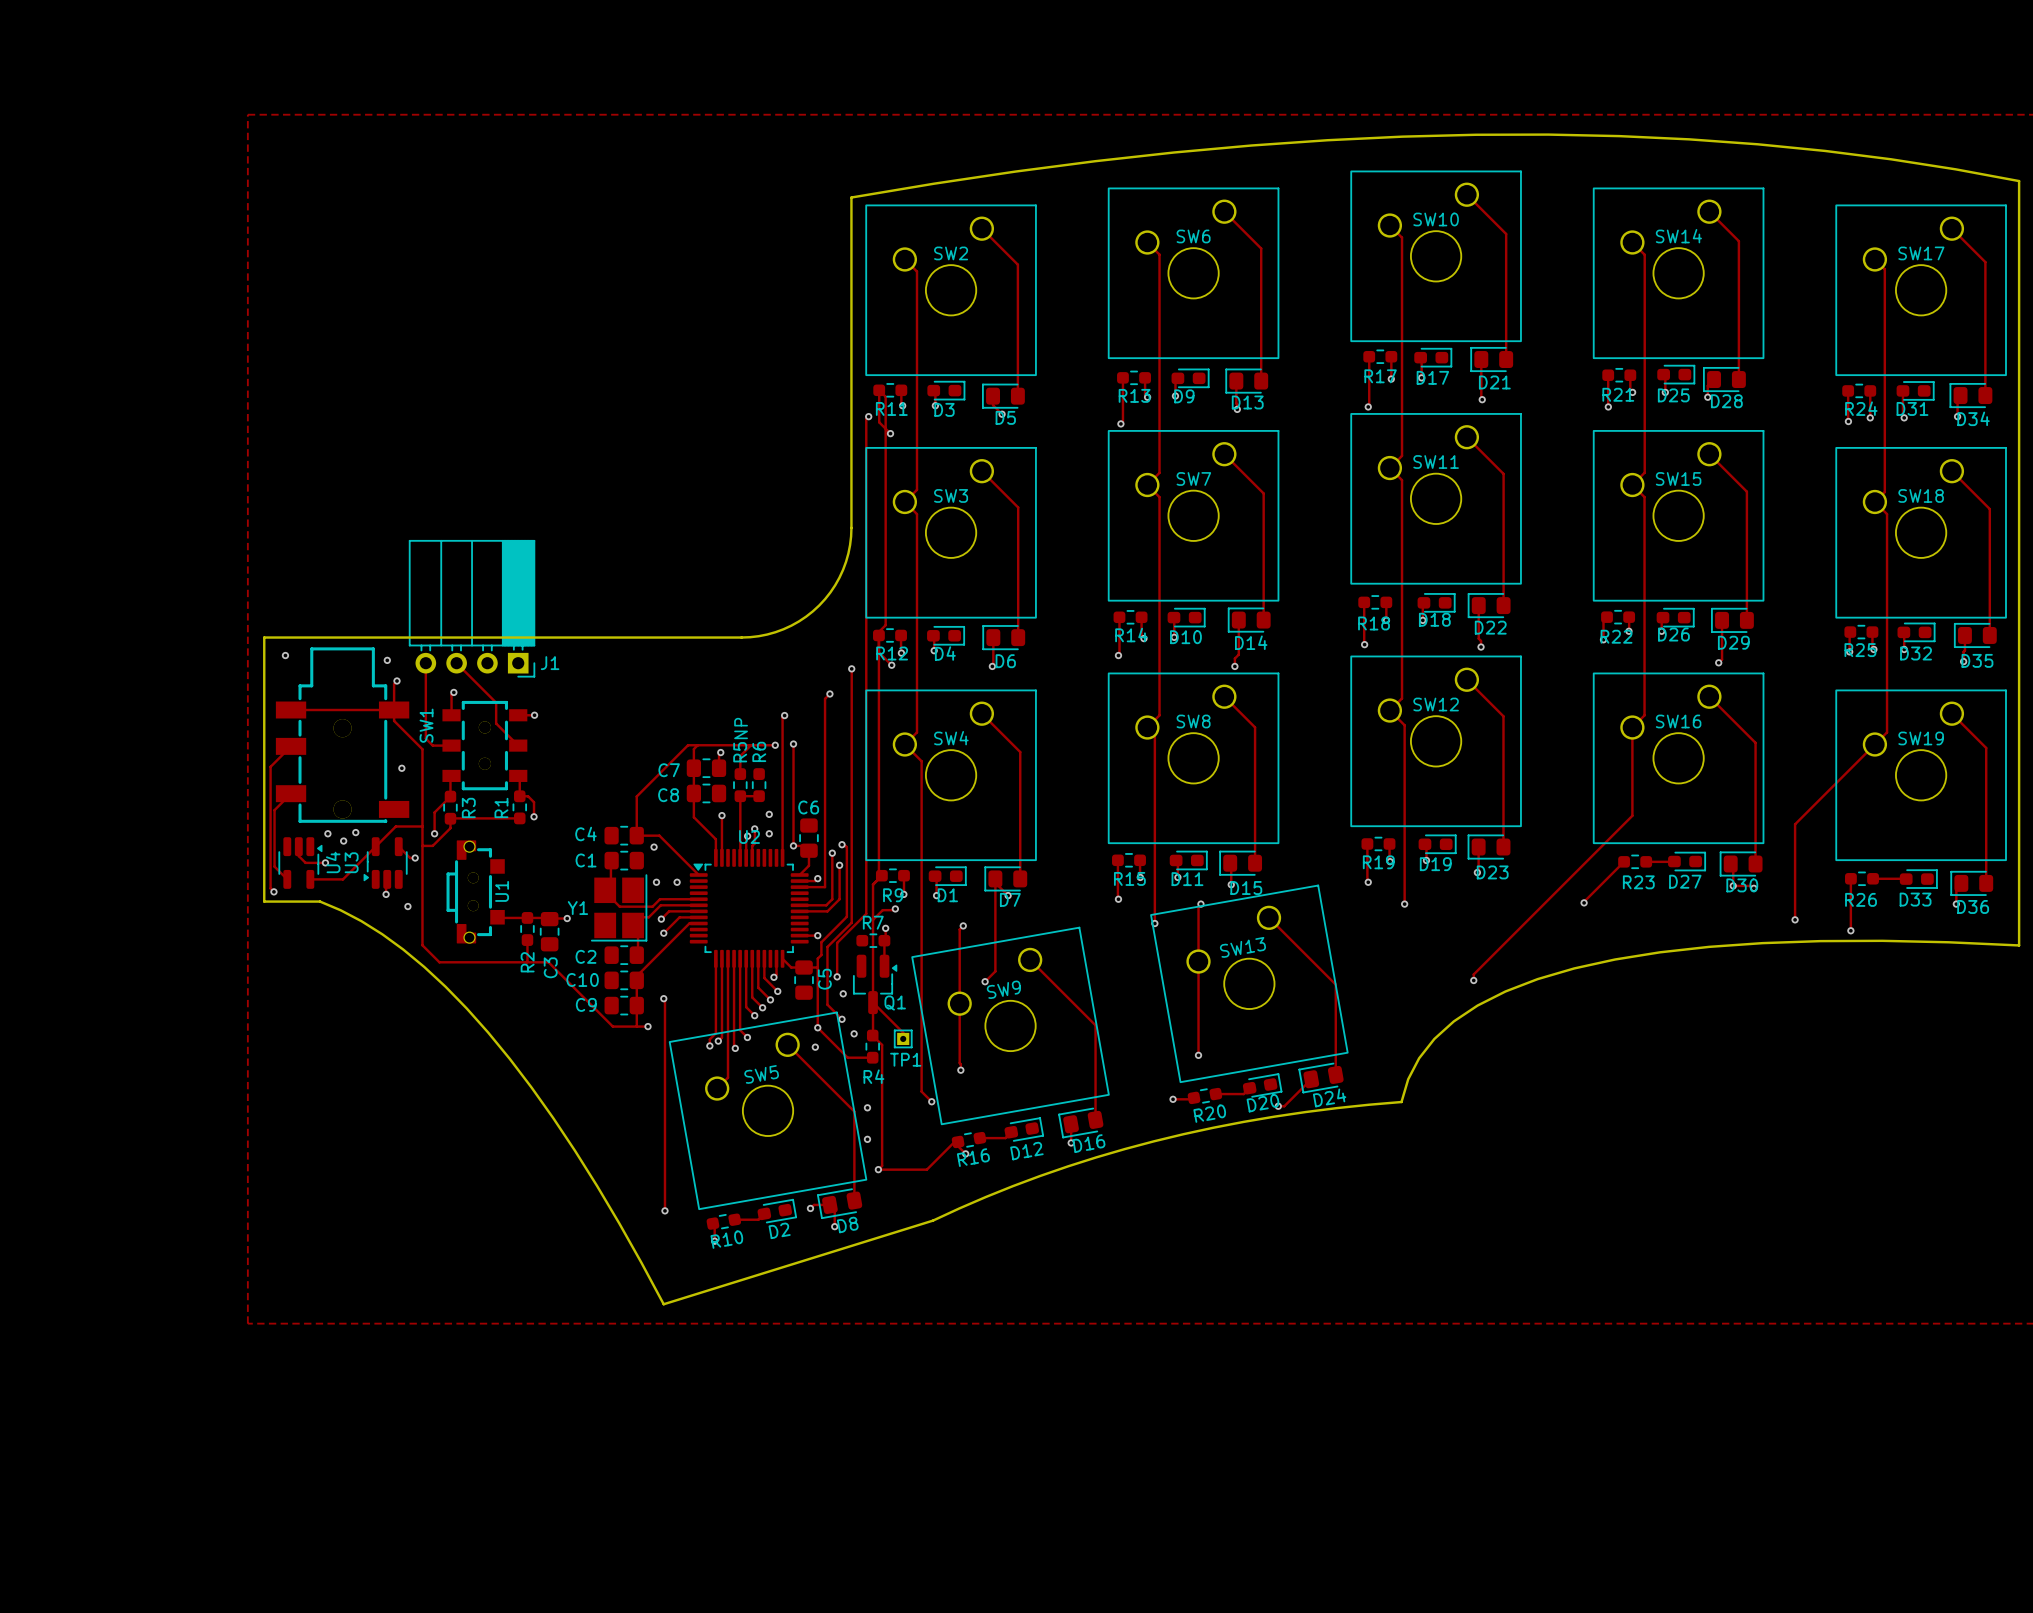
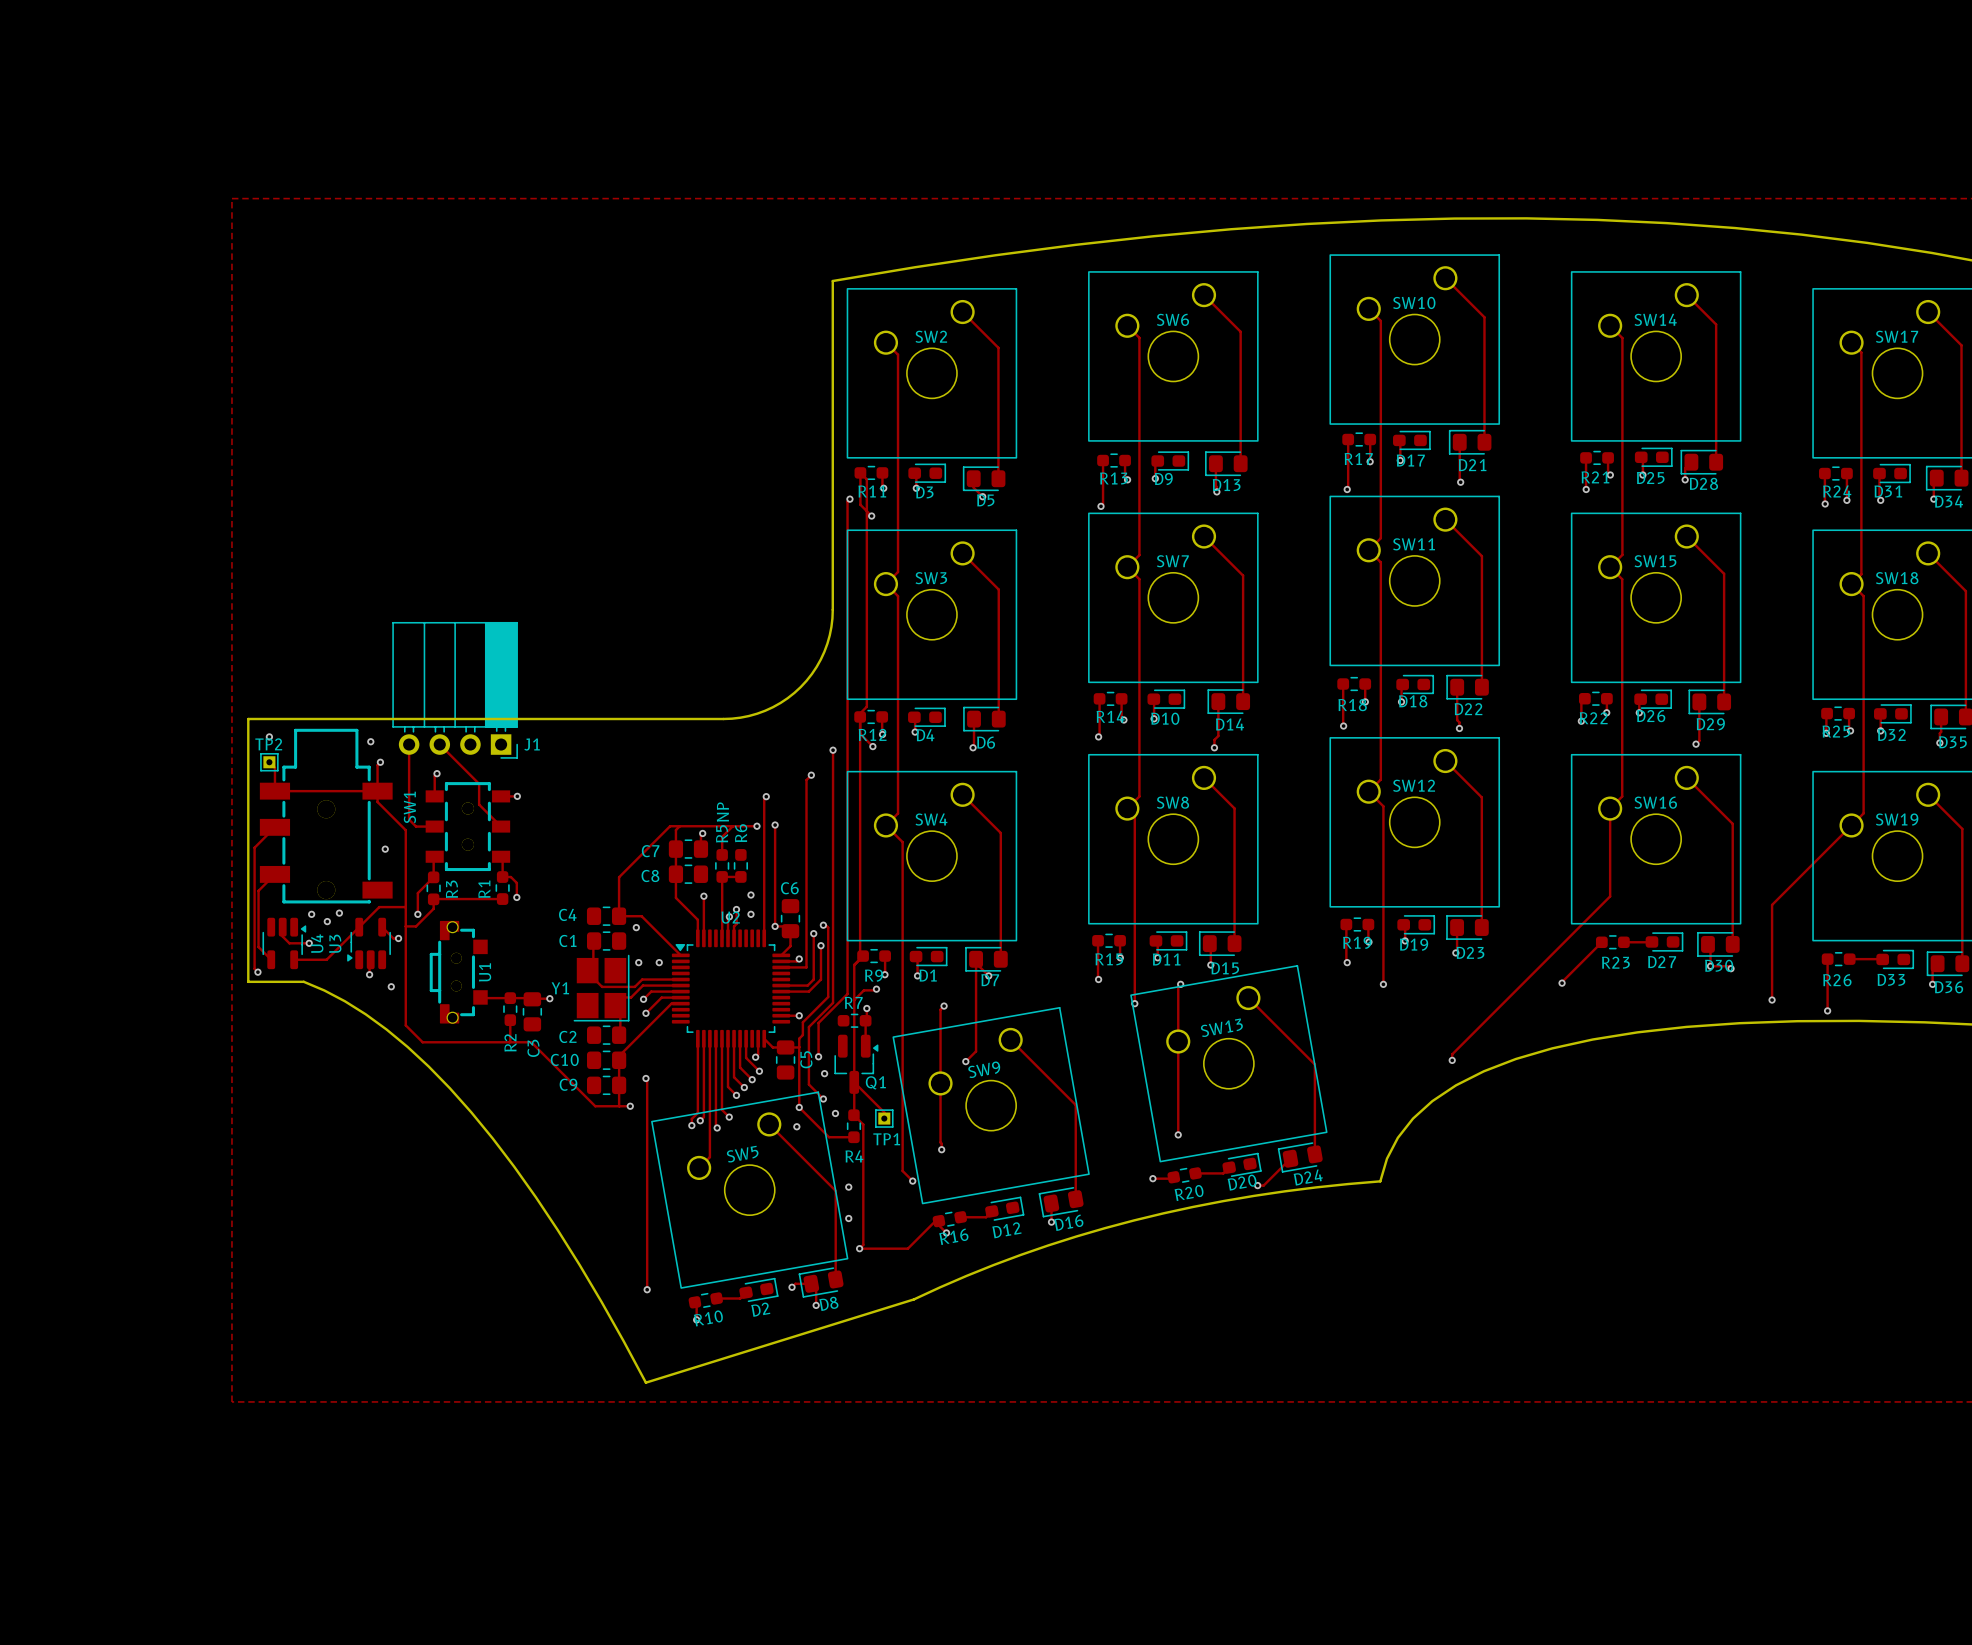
track: none -> (269, 762) (274, 767) (274, 791)
TP2: none -> (269, 762)

